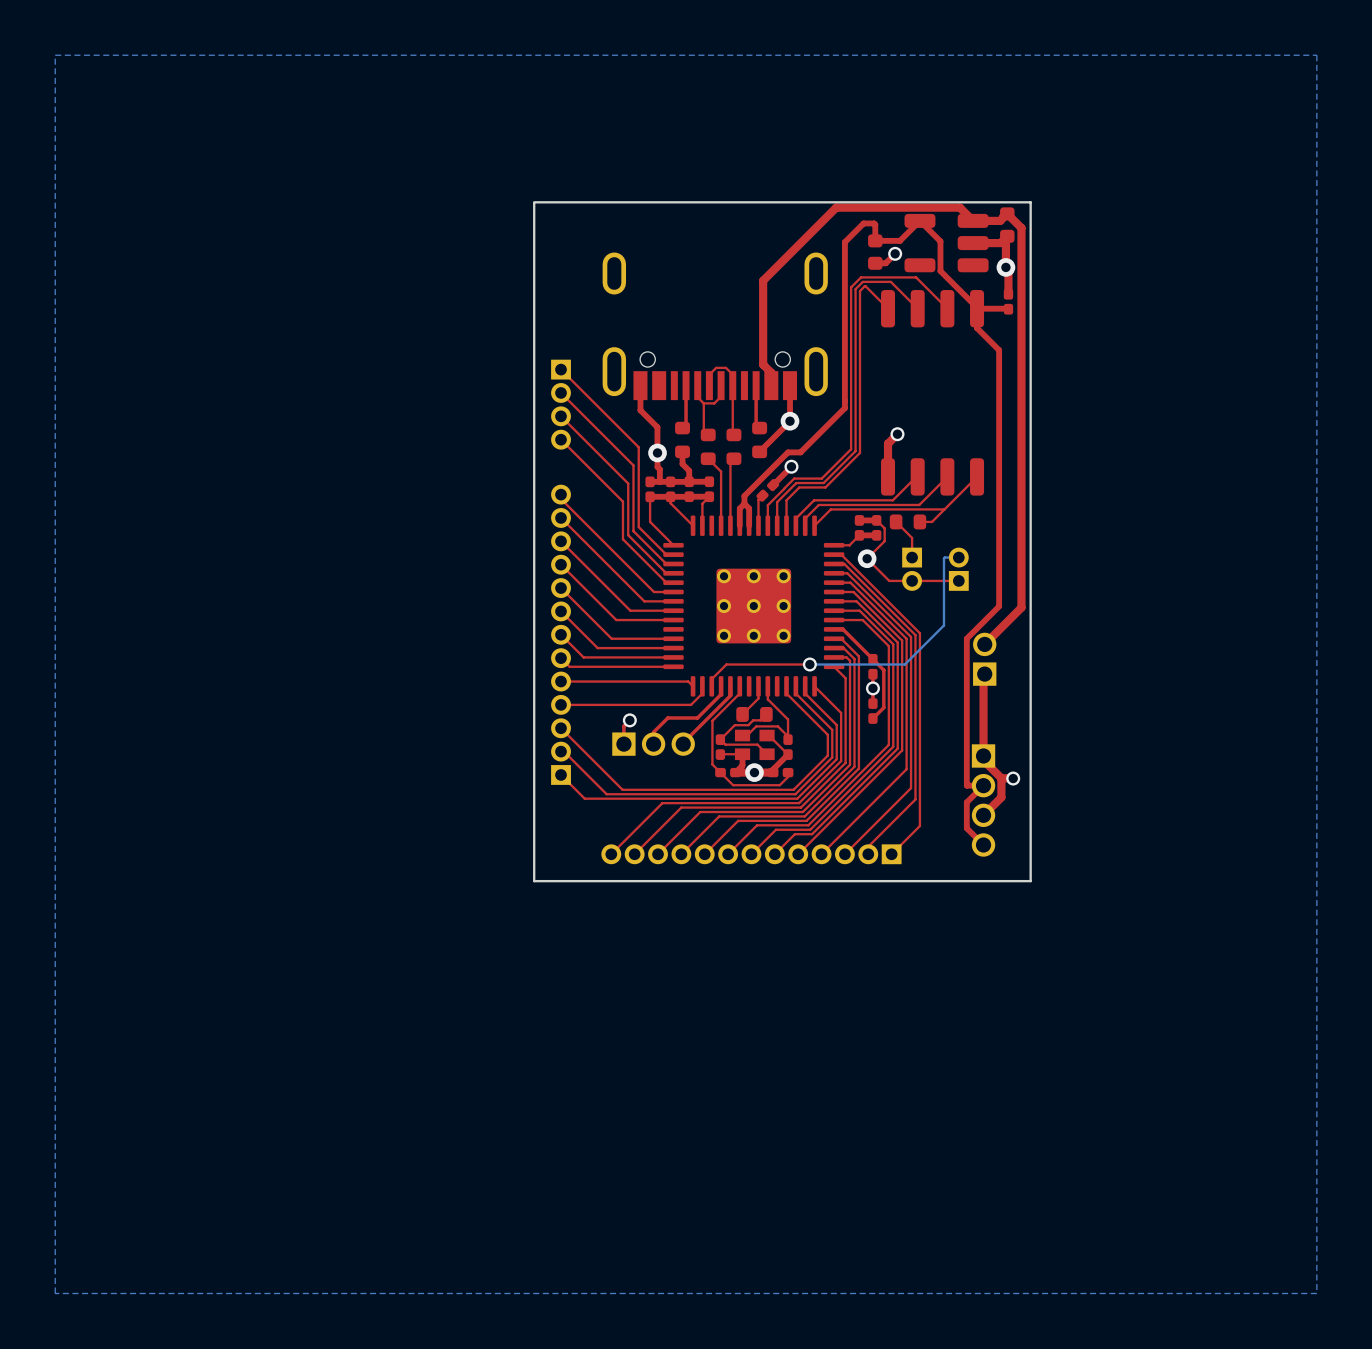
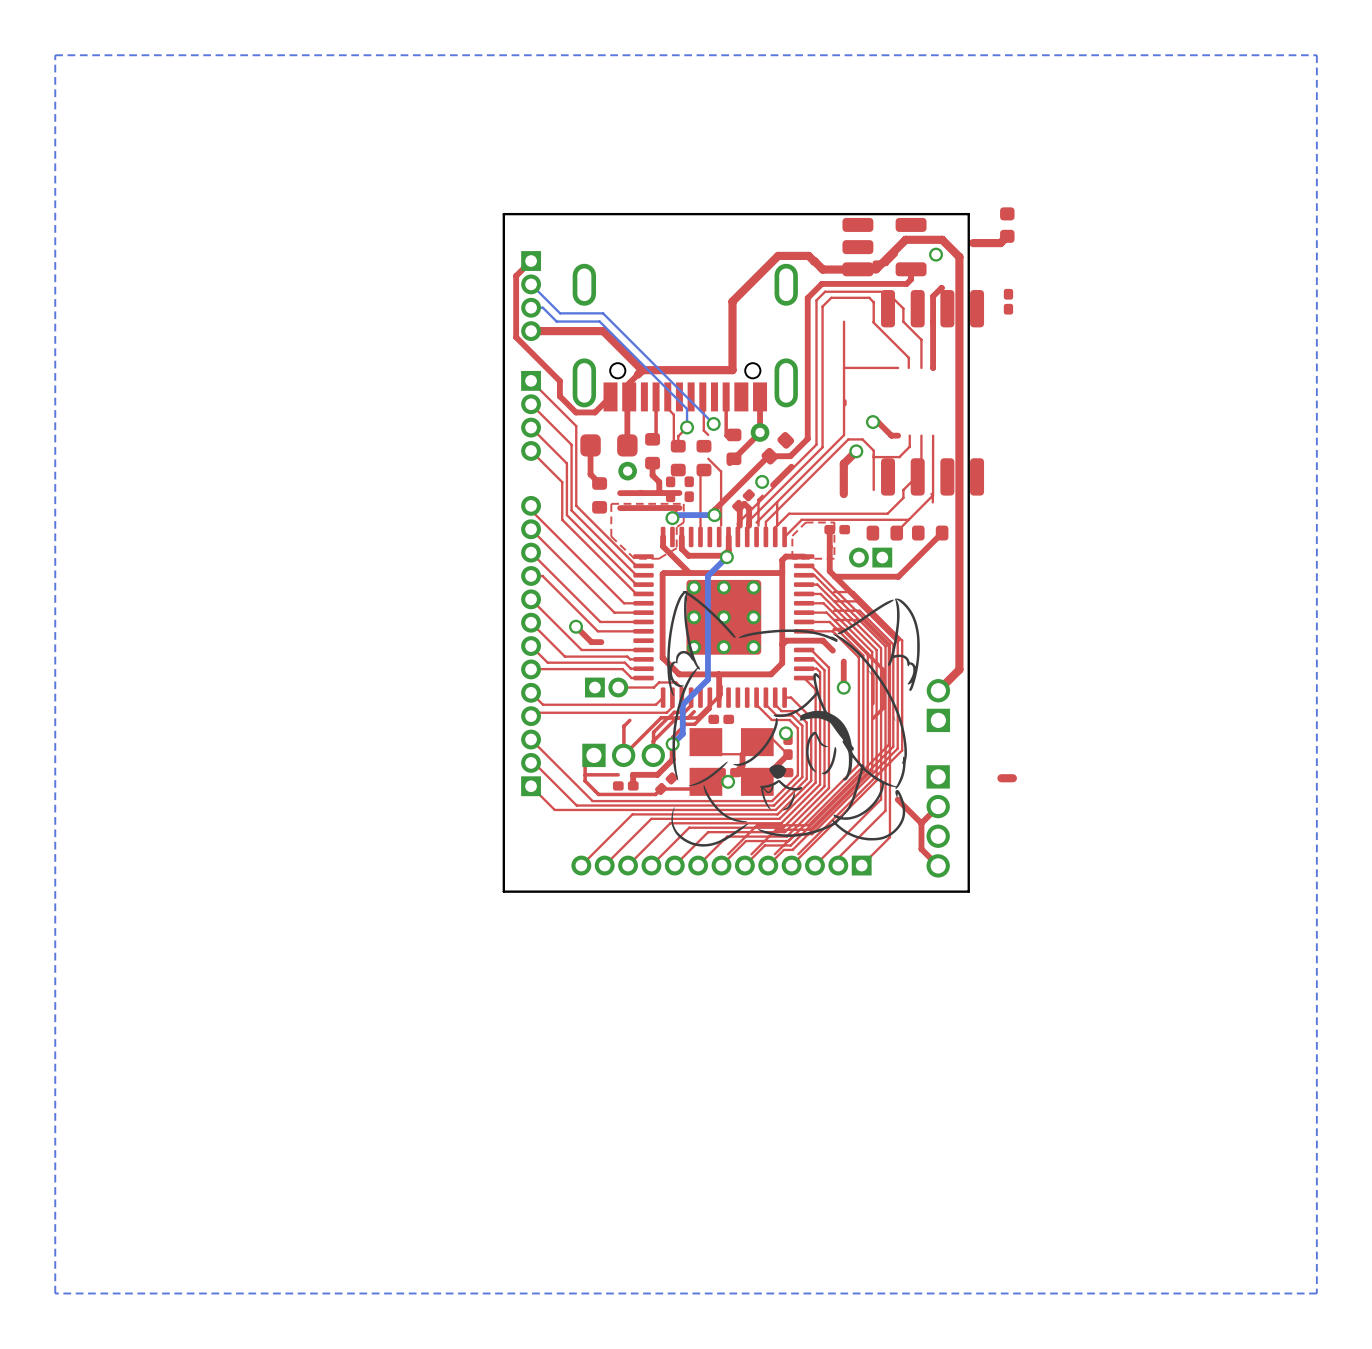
board edge: (534, 202) (1030, 202) (1030, 881) (534, 881) (534, 203) -> none
board edge: none -> (968, 214) (968, 891) (503, 891) (503, 214) (968, 214)
part footprint: [868, 234, 883, 270] -> [842, 217, 927, 277]
part: (946, 243) -> none
top track: (1005, 243) (1008, 294) -> none
via position: (895, 253) -> (936, 254)
top track: none -> (531, 261) (516, 275) (516, 337) (559, 381) (559, 396) (575, 412) (594, 412) (610, 396)
via: (1005, 267) -> none
top track: none -> (857, 269) (876, 269) (905, 239) (942, 239) (959, 257) (959, 669) (938, 690)
top track: none -> (857, 269) (822, 269) (808, 255) (778, 255) (732, 301) (732, 370) (642, 370)
top track: none -> (911, 269) (911, 279) (906, 283) (821, 283) (807, 298) (807, 438) (790, 456) (768, 456) (714, 510) (714, 515)
bottom track: none -> (531, 284) (560, 313) (603, 313) (713, 423)
top track: none -> (941, 287) (933, 296) (933, 367)
part: none -> (531, 296)
bottom track: none -> (531, 307) (542, 307) (556, 321) (599, 321) (687, 408) (687, 427)
top track: (888, 308) (865, 286) (859, 291) (859, 452) (825, 487) (799, 487) (786, 500) (786, 525) -> none
top track: (917, 308) (890, 281) (862, 281) (855, 289) (855, 451) (823, 483) (796, 483) -> (844, 321) (844, 435) (796, 483)
top track: (947, 308) (916, 277) (861, 277) (851, 287) (851, 449) (821, 478) (794, 478) (767, 505) (767, 525) -> none
top track: (976, 308) (976, 328) (999, 350) (999, 606) (966, 638) (966, 785) -> none
top track: (1008, 309) (977, 308) (940, 271) (940, 241) (919, 220) (900, 240) (875, 240) (875, 224) (863, 223) (844, 242) (844, 408) (800, 452) (788, 452) (744, 495) (744, 503) -> none
part position: (715, 326) -> (685, 337)
top track: none -> (531, 331) (603, 331) (642, 370)
top track: none -> (898, 367) (844, 368)
top track: none -> (908, 367) (908, 357) (873, 322) (873, 302) (869, 297) (831, 297) (822, 306) (822, 447) (747, 522) (747, 537)
top track: none -> (921, 367) (921, 339) (903, 321) (903, 308) (886, 291) (825, 291) (816, 300) (816, 444) (737, 523) (737, 537)
top track: (561, 369) (638, 447) (638, 527) (666, 554) (673, 554) -> none
top track: none -> (642, 370) (629, 383) (627, 445)
top track: none -> (531, 380) (576, 426) (576, 505) (636, 565) (643, 565)
top track: (640, 385) (640, 410) (657, 427) (657, 467) (659, 469) (659, 481) -> none
top track: (686, 385) (686, 424) (682, 428) -> (656, 396) (656, 435) (652, 439)
top track: (709, 385) (709, 374) (716, 367) (725, 367) (732, 374) (733, 434) -> none
top track: (721, 385) (721, 396) (714, 403) (703, 403) (697, 397) -> none
top track: (756, 385) (756, 424) (759, 428) -> (726, 396) (726, 435) (729, 439)
top track: (771, 385) (771, 372) (763, 364) (763, 280) (836, 207) (959, 207) (973, 220) (1000, 220) (1007, 213) (1021, 228) (1021, 607) (984, 644) -> none
top track: (790, 385) (790, 421) (759, 451) -> (760, 396) (760, 432) (729, 463)
top track: (561, 392) (633, 465) (633, 531) (666, 563) (673, 563) -> none
top track: none -> (531, 404) (571, 444) (571, 510) (636, 575) (643, 575)
part position: (561, 404) -> (531, 415)
top track: none -> (667, 408) (673, 414) (673, 441) (678, 446) (678, 436) (687, 427)
top track: (561, 416) (628, 483) (628, 535) (666, 573) (673, 573) -> none
part footprint: [752, 421, 768, 459] -> [761, 431, 795, 465]
via position: (790, 421) -> (760, 432)
top track: none -> (872, 422) (877, 422) (891, 435) (898, 435)
via: none -> (872, 422)
via: none -> (713, 423)
top track: none -> (531, 427) (566, 463) (566, 515) (636, 584) (643, 584)
via: none -> (687, 427)
top track: (897, 434) (888, 443) (888, 476) -> none
via: (897, 434) -> none
top track: none -> (909, 435) (909, 446) (899, 457) (873, 457)
top track: none -> (921, 435) (921, 471) (903, 489) (903, 497) (887, 513) (789, 513) (775, 527) (775, 537)
top track: none -> (933, 435) (933, 495) (896, 531)
top track: (561, 439) (622, 501) (622, 539) (666, 582) (673, 582) -> none
part: (682, 439) -> none
top track: none -> (590, 445) (590, 474) (599, 483)
part: none -> (608, 445)
part position: (708, 446) -> (703, 458)
top track: none -> (531, 450) (562, 482) (562, 519) (636, 593) (643, 593)
part: none -> (652, 451)
top track: (682, 451) (682, 464) (689, 470) (689, 481) (709, 481) -> none
top track: none -> (856, 451) (843, 463) (843, 494)
via: none -> (856, 451)
via position: (657, 452) -> (627, 471)
part: none -> (678, 458)
top track: (733, 458) (730, 462) (730, 525) -> (703, 470) (700, 473) (700, 537)
top track: none -> (652, 463) (652, 475) (659, 482) (659, 493)
via position: (791, 466) -> (762, 481)
top track: (917, 476) (892, 500) (814, 500) (795, 518) (795, 525) -> none
top track: (947, 476) (919, 504) (818, 504) (805, 518) (805, 525) -> none
top track: (975, 476) (932, 521) (919, 521) -> none
top track: (689, 481) (650, 481) -> none
part: (650, 489) -> none
part: (709, 489) -> none
top track: none -> (873, 489) (873, 450) (862, 439) (848, 439) (765, 521) (765, 537)
part position: (767, 490) -> (743, 500)
top track: none -> (679, 493) (620, 493)
top track: (561, 494) (561, 499) (654, 592) (673, 592) -> (531, 505) (531, 510) (624, 603) (643, 603)
top track: none -> (931, 494) (932, 502)
part: none -> (599, 495)
top track: (670, 496) (670, 503) (693, 525) -> none
top track: (689, 496) (709, 496) (702, 503) (702, 525) -> none
top track: (689, 496) (650, 496) (650, 521) (673, 545) -> none
top zone outline: none -> (683, 503) (611, 503) (611, 536) (634, 558) (659, 558) (676, 548) (676, 527) (683, 522) (683, 503)
top track: none -> (620, 508) (679, 507) (672, 514) (672, 518)
top track: (944, 509) (830, 509) (814, 525) -> none
bottom track: none -> (714, 515) (675, 515) (672, 518)
via: none -> (714, 515)
part footprint: [872, 515, 882, 541] -> [866, 525, 904, 541]
top track: (561, 517) (644, 601) (673, 601) -> (531, 529) (614, 612) (643, 612)
via: none -> (672, 518)
top track: none -> (908, 519) (801, 519) (784, 537)
top track: (859, 520) (876, 520) (884, 528) (884, 541) (867, 558) (889, 580) (958, 580) -> none
top track: (896, 521) (912, 537) (912, 557) -> none
part position: (908, 521) -> (930, 533)
top zone outline: none -> (834, 522) (805, 522) (792, 535) (792, 558) (834, 558) (834, 522)
part rotation: 0° (859, 527) -> 90° clockwise (837, 529)
part position: (859, 527) -> (837, 529)
top track: none -> (829, 529) (829, 571) (897, 639)
top track: none -> (942, 533) (898, 576) (835, 576)
top track: (876, 535) (859, 535) (849, 545) (834, 545) -> none
top track: none -> (663, 537) (663, 546) (689, 573)
top track: none -> (728, 537) (728, 550) (723, 555) (688, 555) (681, 548) (681, 537)
top track: (561, 541) (630, 610) (673, 610) -> (531, 552) (600, 621) (643, 621)
top track: (834, 554) (841, 554) (919, 633) (919, 826) (891, 854) -> (804, 565) (811, 565) (889, 644) (889, 837) (861, 865)
top track: none -> (804, 556) (785, 556) (782, 560) (782, 663) (771, 674) (679, 674) (662, 657) (663, 573)
bottom track: none -> (726, 557) (707, 576) (707, 679) (682, 704) (682, 734) (672, 744)
via: none -> (726, 557)
bottom track: (958, 557) (943, 558) (943, 625) (904, 664) (809, 664) -> none
via: (867, 558) -> none
top track: (834, 563) (844, 563) (915, 635) (915, 799) (868, 846) (868, 854) -> (804, 575) (814, 575) (885, 646) (885, 810) (838, 857) (838, 865)
top track: (561, 564) (616, 620) (673, 620) -> none
part rotation: 0° (912, 569) -> 90° clockwise (870, 557)
part position: (912, 569) -> (870, 557)
part: (958, 569) -> none
top track: none -> (782, 572) (663, 573)
top track: (834, 573) (847, 573) (911, 636) (911, 788) (844, 854) -> (804, 584) (817, 584) (881, 648) (881, 799) (814, 865)
top track: none -> (531, 575) (542, 575) (597, 631) (643, 631)
top track: (834, 582) (850, 582) (906, 638) (906, 769) (821, 854) -> (804, 593) (820, 593) (876, 650) (876, 780) (791, 865)
top track: (561, 588) (611, 638) (673, 638) -> (531, 599) (581, 650) (643, 650)
drawing: none -> [667, 590, 920, 847]
top track: none -> (804, 603) (823, 603) (872, 651) (872, 770) (792, 849) (783, 849) (768, 865)
part position: (753, 606) -> (723, 617)
top track: (561, 611) (597, 648) (673, 648) -> none
top track: none -> (804, 612) (826, 612) (867, 653) (867, 768) (790, 845) (764, 845) (744, 865)
top track: none -> (804, 621) (829, 621) (863, 655) (863, 766) (788, 841) (746, 841) (721, 865)
top track: none -> (531, 622) (564, 656) (627, 656) (630, 659) (643, 659)
top track: none -> (576, 626) (591, 642) (601, 642)
via: none -> (576, 626)
top track: (561, 634) (583, 657) (673, 657) -> none
part position: (561, 634) -> (531, 646)
top track: (834, 638) (841, 638) (858, 657) -> (804, 631) (832, 631) (858, 657)
top track: none -> (782, 644) (786, 640) (822, 640) (832, 650)
top track: none -> (531, 646) (547, 662) (624, 662) (630, 668) (643, 668)
top track: (834, 648) (843, 648) (854, 658) (854, 766) (804, 816) (719, 816) (681, 854) -> none
top track: none -> (804, 650) (811, 650) (828, 667) (828, 788) (784, 832) (708, 832) (674, 865)
top track: (834, 657) (846, 657) (850, 660) (850, 764) (802, 812) (700, 812) (658, 854) -> none
top track: (561, 658) (569, 666) (673, 666) -> none
top track: none -> (804, 659) (813, 659) (824, 670) (824, 786) (783, 827) (689, 827) (651, 865)
part position: (984, 659) -> (938, 705)
top track: none -> (843, 661) (843, 687)
top track: (809, 664) (726, 664) (711, 679) (711, 686) -> none
via: (809, 664) -> none
top track: (834, 666) (845, 678) (845, 762) (800, 807) (681, 807) (634, 854) -> none
part: (872, 666) -> none
top track: none -> (804, 668) (816, 668) (820, 672) (820, 784) (781, 823) (670, 823) (628, 865)
top track: none -> (531, 669) (622, 669) (631, 678) (643, 678)
top track: none -> (718, 674) (719, 697)
top track: (984, 674) (983, 760) (1001, 778) (1001, 797) (983, 815) -> none
top track: none -> (804, 678) (815, 689) (815, 782) (779, 818) (651, 818) (604, 865)
top track: (561, 681) (688, 681) (693, 686) -> none
top track: (702, 686) (702, 693) (691, 704) (561, 704) -> none
top track: (730, 686) (730, 695) (683, 744) -> none
top track: (739, 686) (739, 693) (712, 720) (712, 764) (733, 785) (779, 785) (788, 776) (788, 772) -> none
top track: (758, 686) (758, 698) (742, 714) -> none
top track: (767, 686) (767, 699) (788, 719) (788, 739) -> none
top track: (786, 686) (786, 693) (827, 734) (827, 755) (793, 789) (622, 789) (561, 728) -> none
top track: (795, 686) (795, 693) (832, 729) (832, 757) (795, 794) (606, 794) (564, 751) (561, 751) -> none
top track: (805, 686) (805, 693) (836, 725) (836, 759) (797, 798) (584, 798) (561, 774) -> none
top track: (814, 686) (841, 712) (841, 761) (799, 803) (662, 803) (611, 854) -> none
part: none -> (606, 687)
top track: none -> (618, 687) (653, 687) (659, 682) (676, 682) (681, 688) (681, 697)
via: none -> (843, 687)
via: (872, 688) -> none
top track: none -> (531, 692) (543, 704) (655, 704) (663, 697)
top track: none -> (672, 697) (672, 707) (666, 712) (534, 712) (531, 716)
top track: none -> (691, 697) (691, 705) (684, 712) (674, 712) (668, 717) (661, 717) (623, 755)
top track: none -> (709, 697) (709, 709) (694, 724) (685, 724) (672, 737) (672, 759) (657, 774) (633, 774) (633, 785)
top track: none -> (756, 697) (756, 704) (771, 719) (789, 719) (797, 728) (797, 775) (772, 801) (592, 801) (531, 739)
top track: none -> (765, 697) (765, 704) (776, 715) (792, 715) (802, 725) (802, 777) (773, 805) (576, 805) (534, 762) (531, 762)
top track: none -> (775, 697) (775, 704) (781, 711) (795, 711) (806, 722) (806, 778) (775, 809) (554, 809) (531, 786)
top track: none -> (784, 697) (791, 697) (811, 717) (811, 780) (777, 814) (632, 814) (581, 865)
top track: none -> (694, 711) (687, 717) (676, 717) (653, 741) (653, 755)
part: (872, 711) -> none
part: (754, 714) -> none
top track: (766, 714) (760, 720) (753, 720) (748, 725) (734, 725) (720, 739) (725, 744) (757, 744) (767, 754) -> none
via position: (629, 720) -> (672, 744)
via: none -> (785, 733)
top track: (742, 735) (747, 735) (756, 726) (777, 726) (788, 736) -> none
part position: (653, 744) -> (623, 755)
part: (754, 744) -> none
part rotation: 0° (720, 747) -> 90° clockwise (721, 719)
part position: (720, 747) -> (721, 719)
top track: none -> (593, 755) (585, 764) (585, 781) (598, 794) (655, 794) (661, 789) (698, 789) (705, 781) (728, 781)
part: none -> (731, 761)
top track: (858, 764) (858, 768) (806, 820) (738, 820) (704, 854) -> (858, 764) (786, 836) (727, 836) (698, 865)
via: (754, 772) -> none
top track: none -> (618, 774) (585, 774)
via: (1013, 778) -> none
via: none -> (728, 781)
part: none -> (666, 783)
part: none -> (625, 785)
top track: (967, 785) (983, 785) (966, 802) (966, 828) (983, 845) -> none
top track: none -> (897, 799) (921, 823)
part position: (983, 800) -> (938, 821)
top track: none -> (938, 806) (921, 823) (921, 849) (938, 865)
part position: (751, 854) -> (721, 865)

